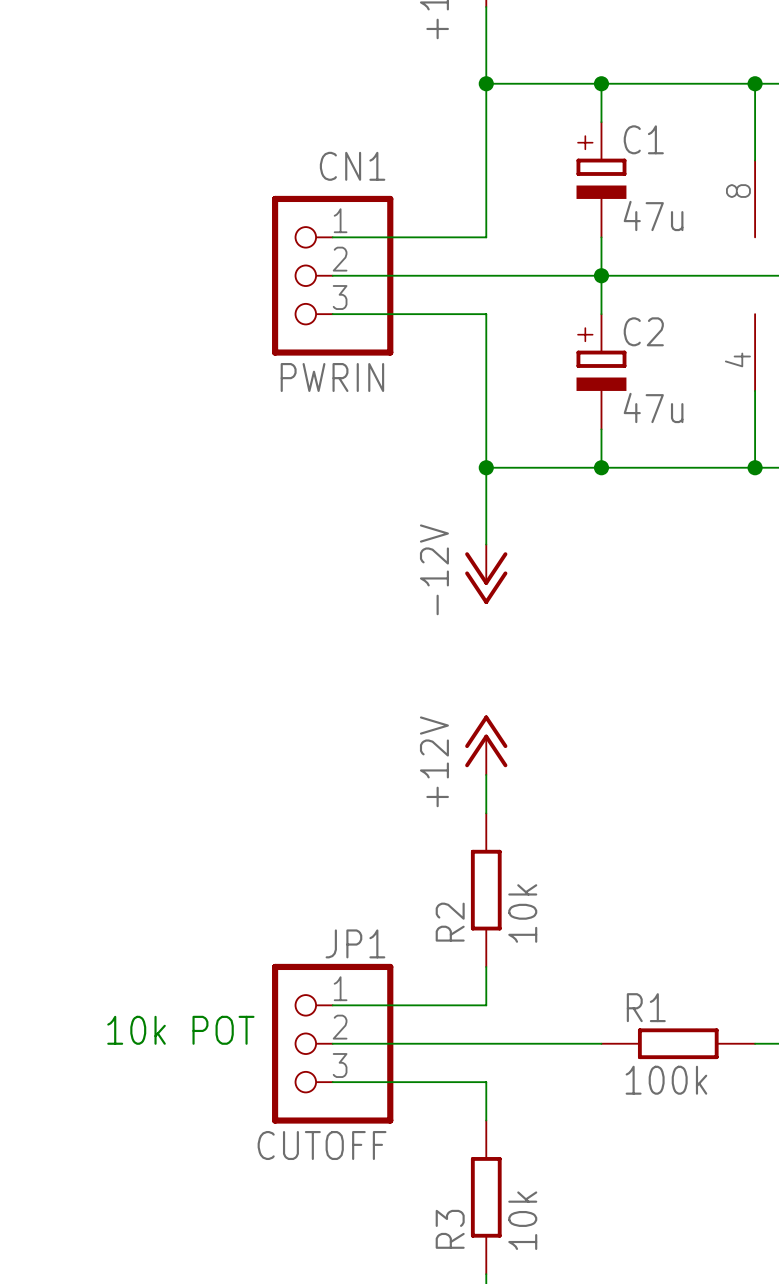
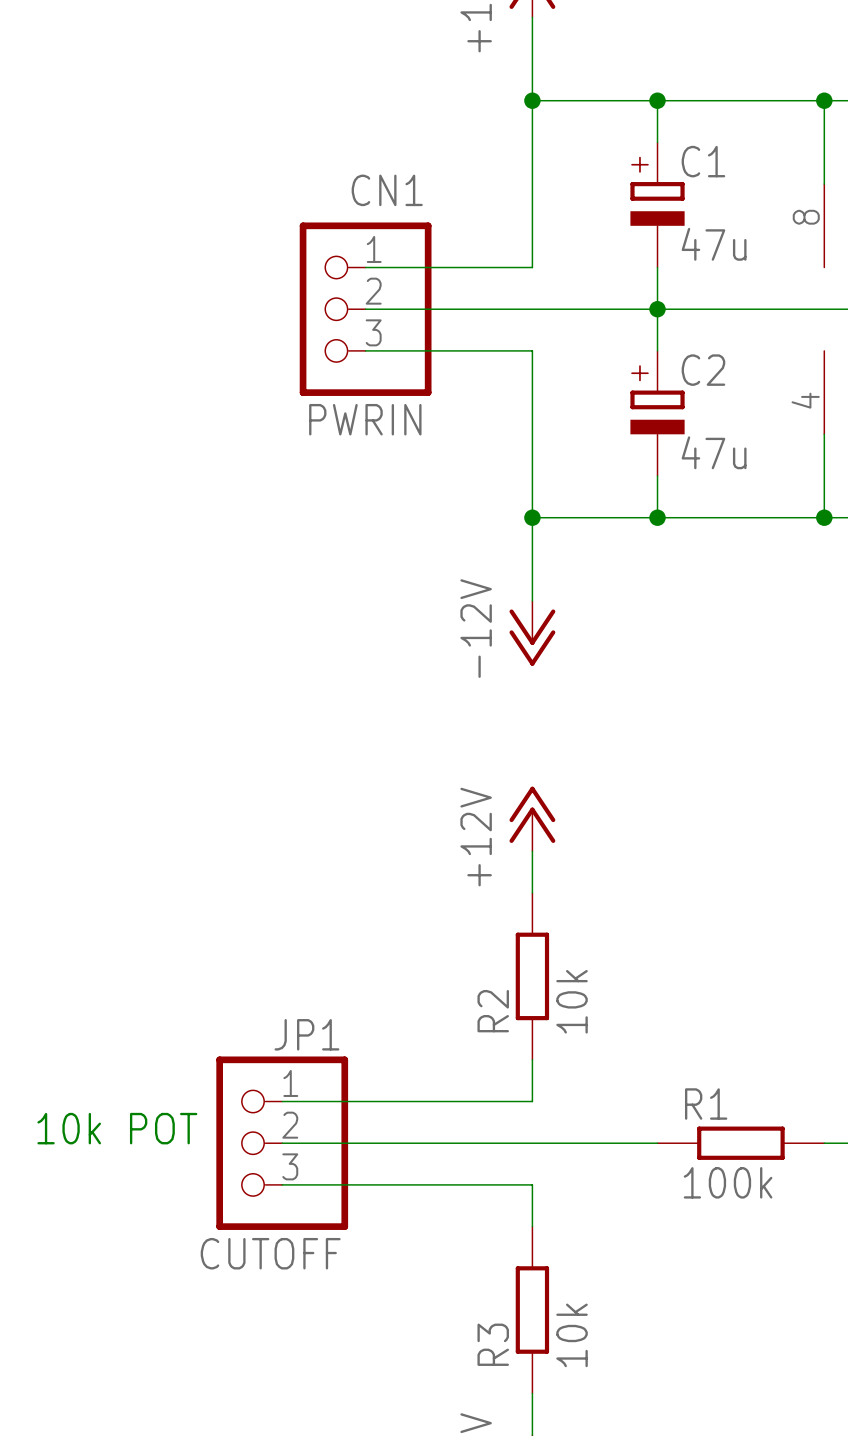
wire: none -> (282, 1101) (365, 1101)
text position: 10k POT (180, 1030) -> 10k POT (117, 1128)
wire: none -> (282, 1143) (365, 1143)
JP1 position: (332, 1043) -> (282, 1143)
wire: none -> (282, 1184) (365, 1184)

